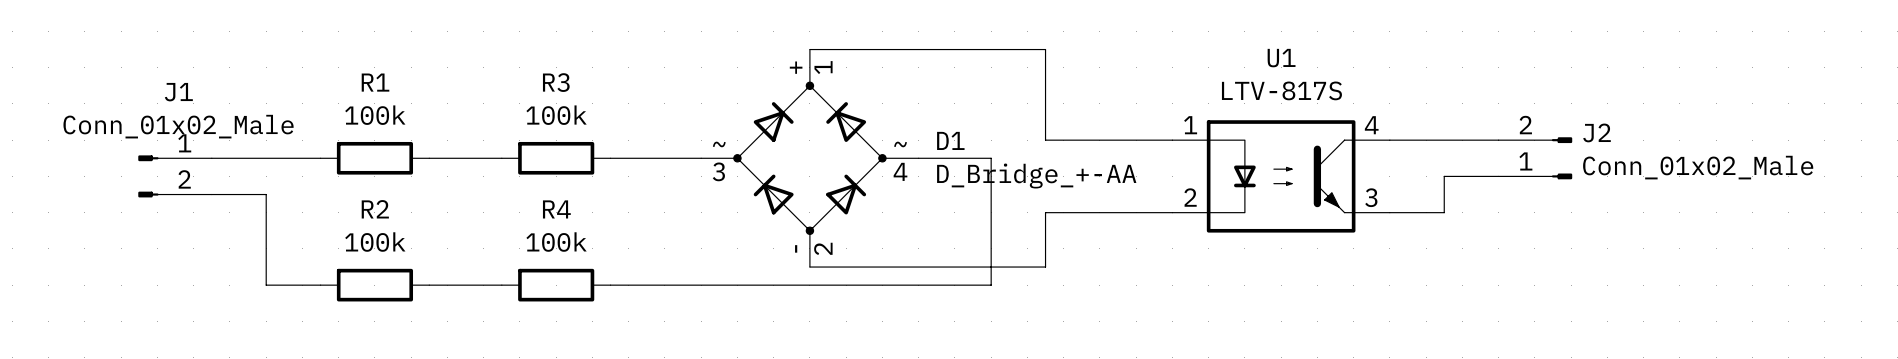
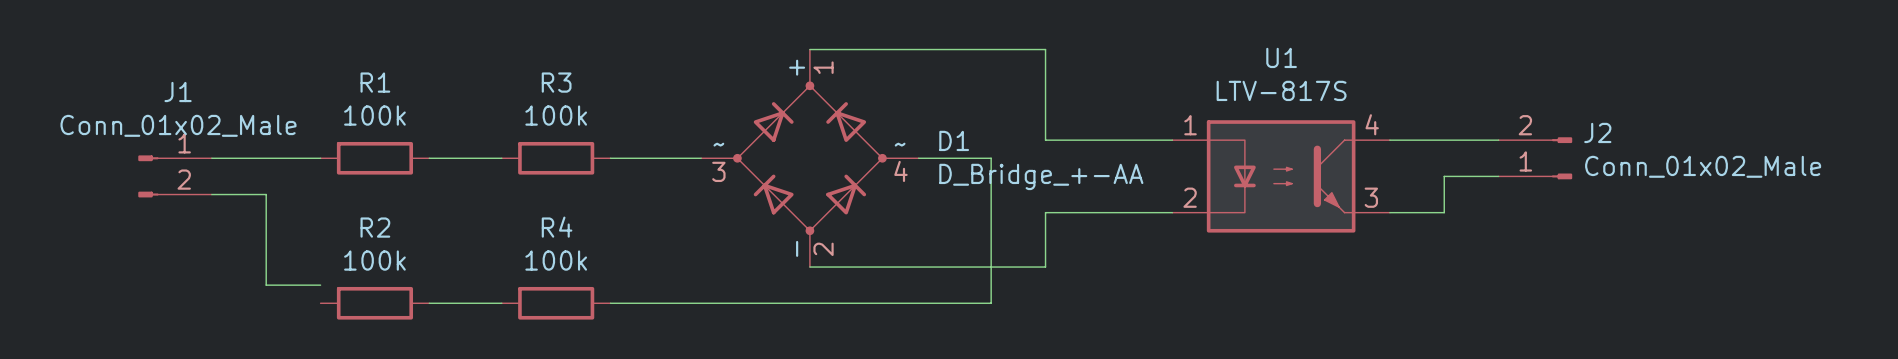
R2 position: (374, 285) -> (374, 303)
wire: (429, 285) (501, 285) -> (429, 303) (501, 303)
R4 position: (556, 285) -> (556, 303)
wire: (610, 285) (991, 285) -> (610, 303) (991, 303) (991, 285)

